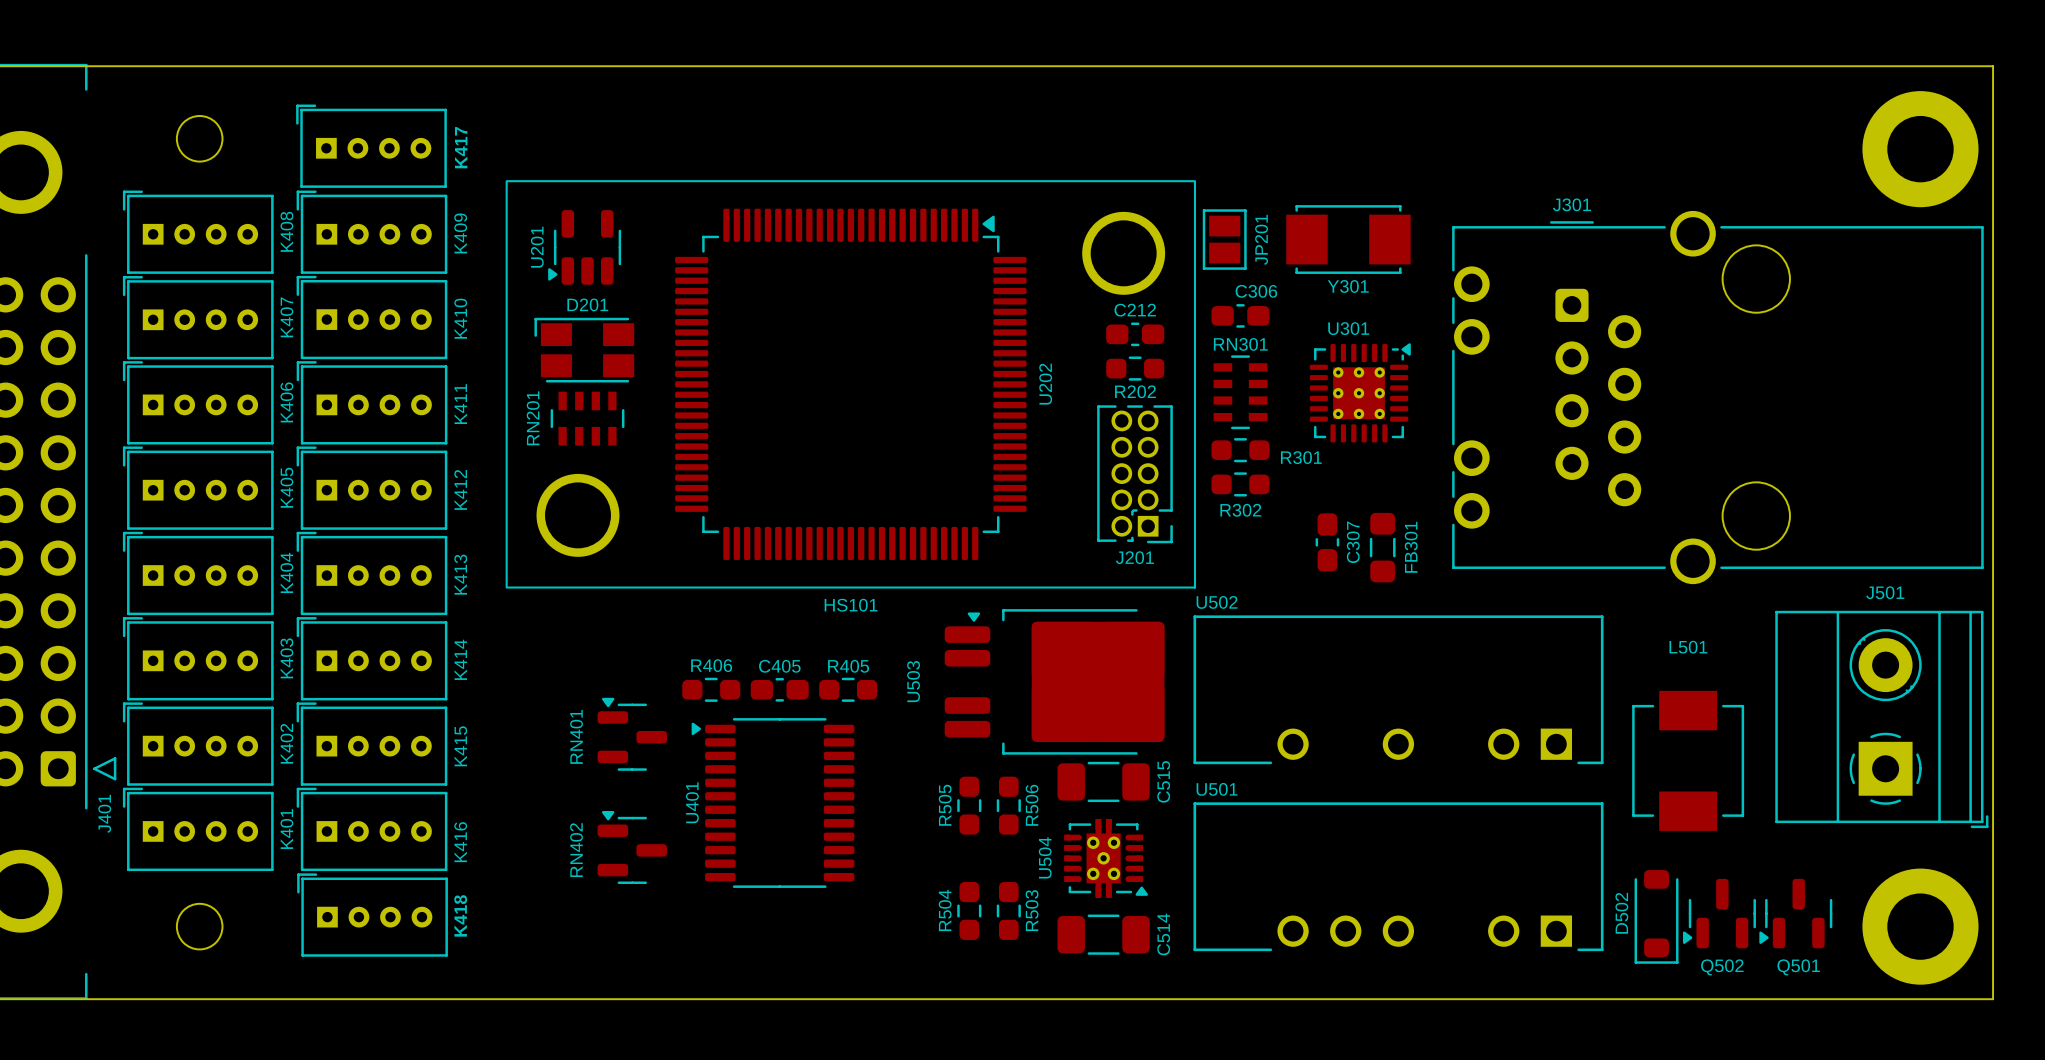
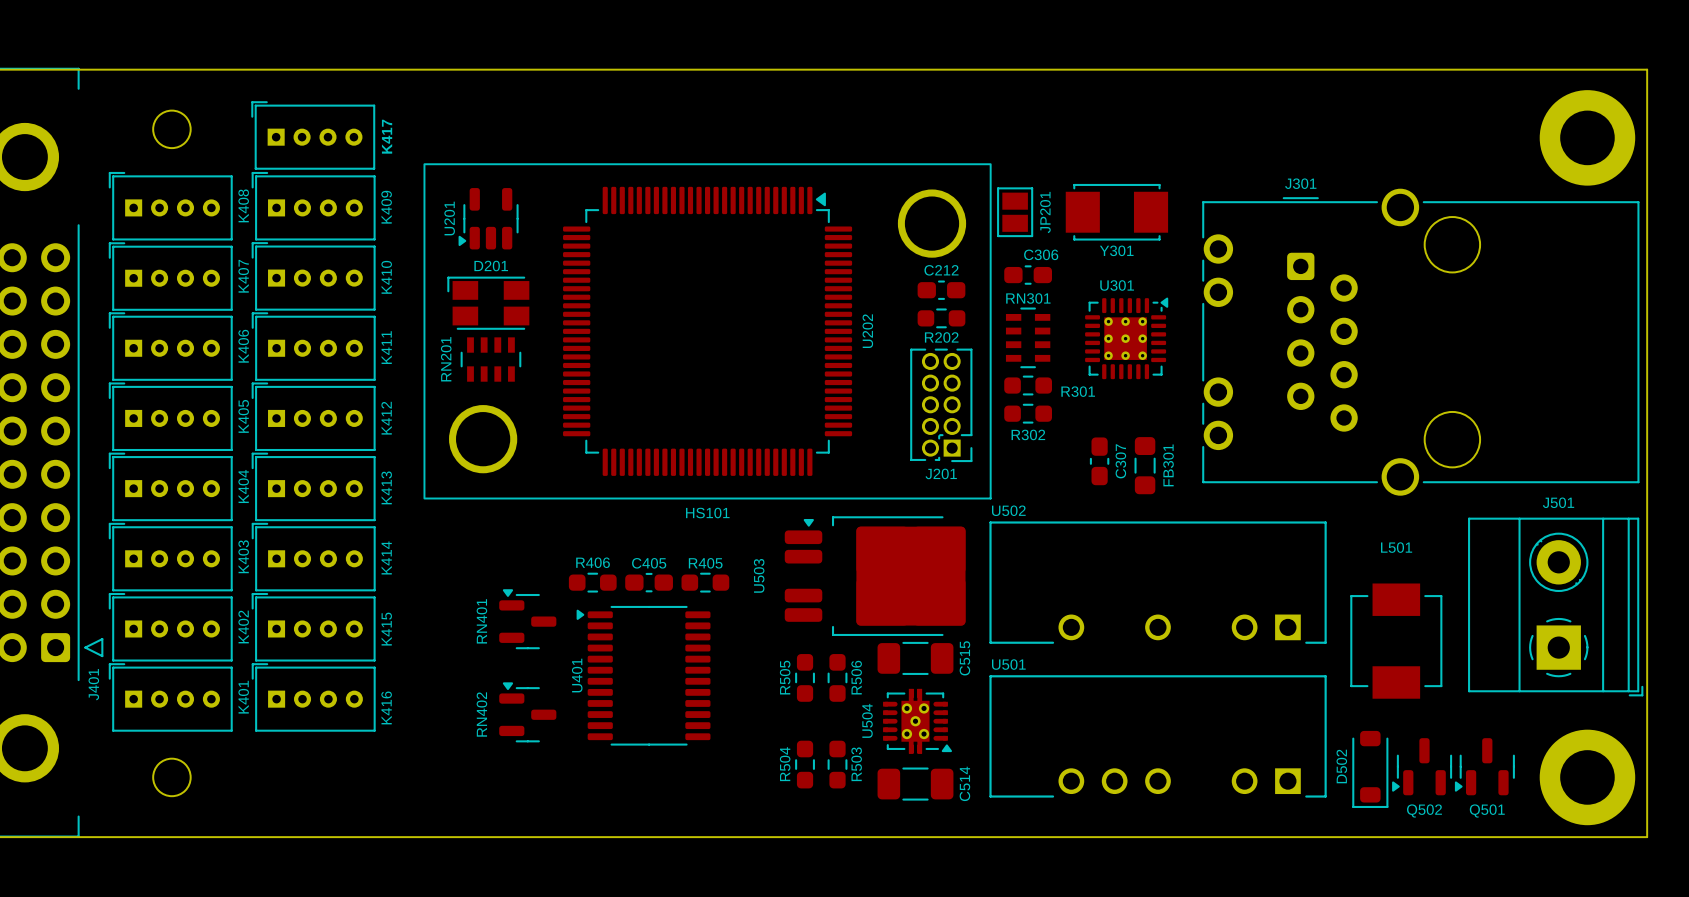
K418: (372, 915) -> none

